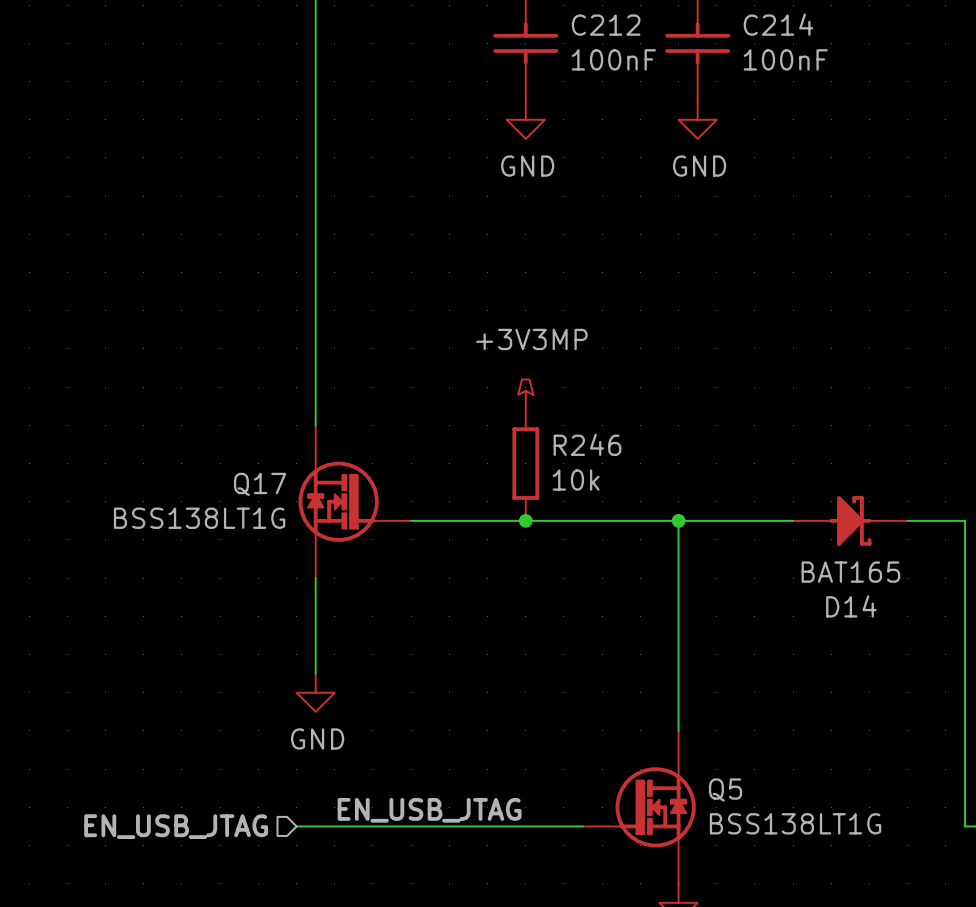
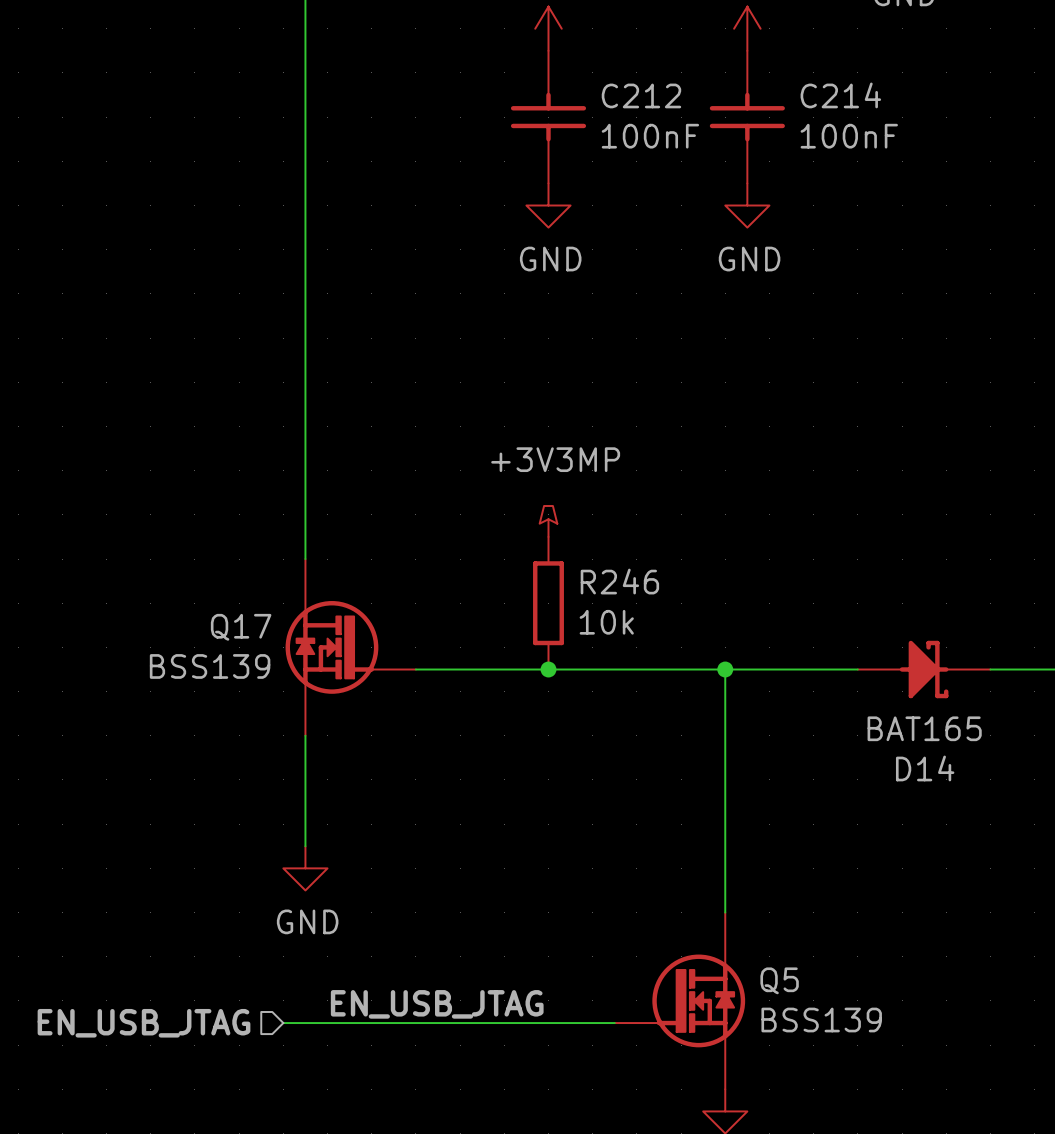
Q17 value: BSS138LT1G (199, 518) -> BSS139 (210, 666)
Q5 value: BSS138LT1G (795, 823) -> BSS139 (821, 1020)

